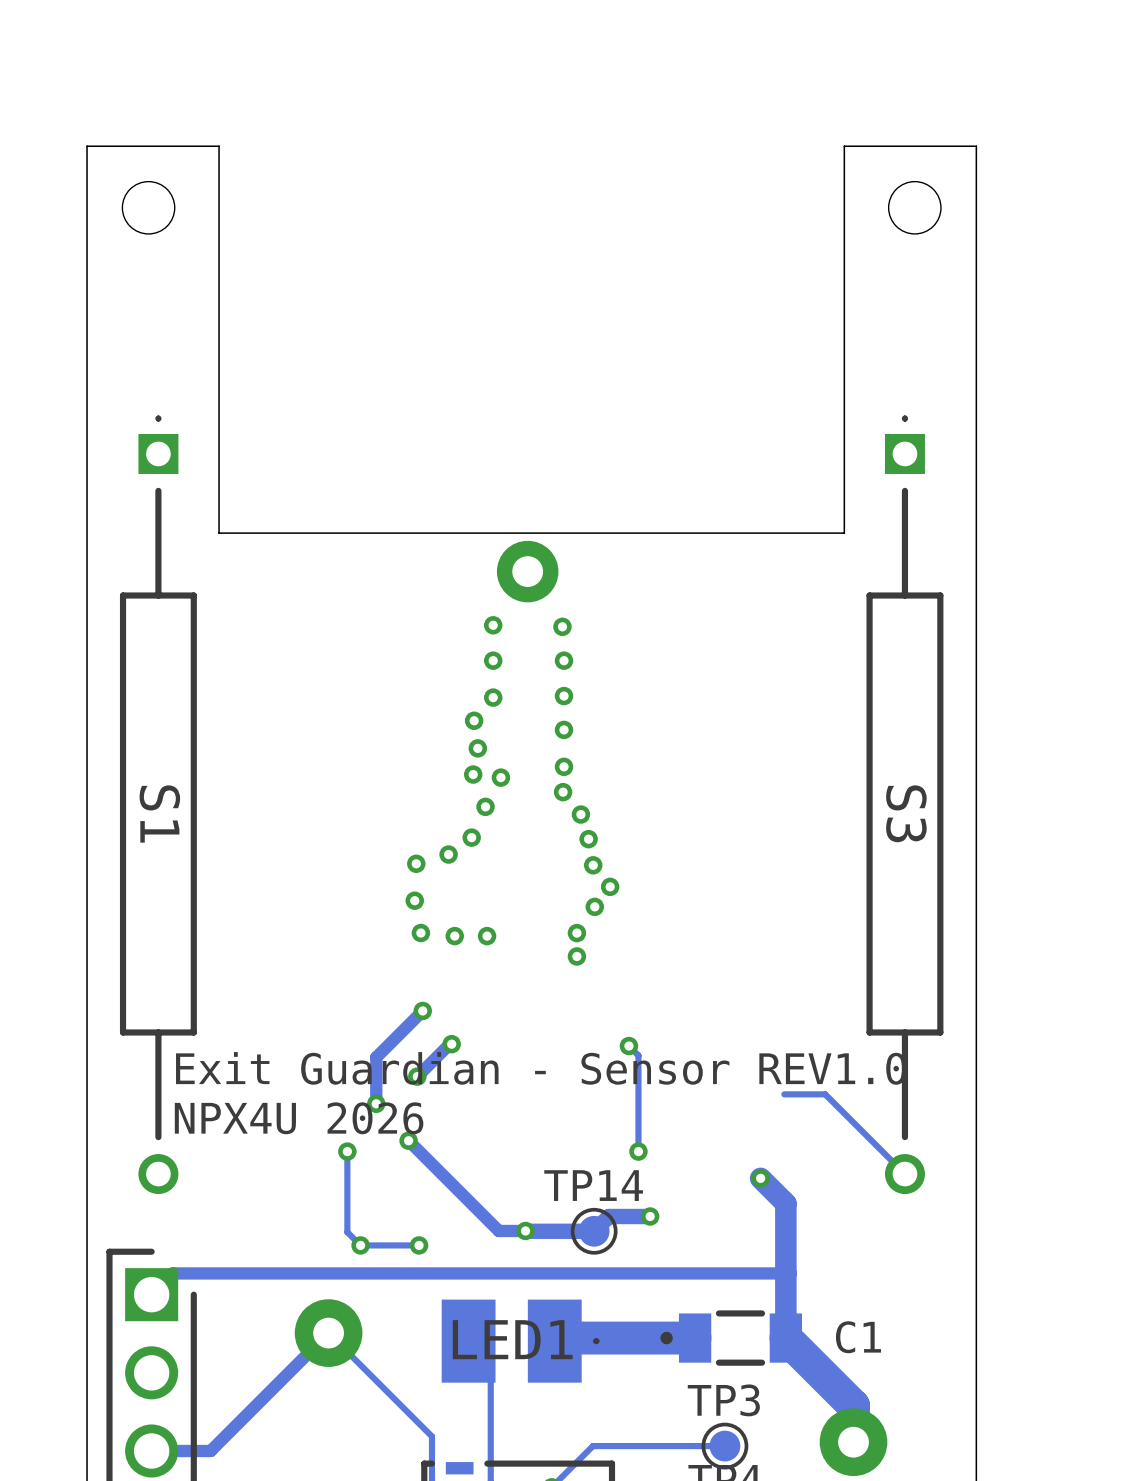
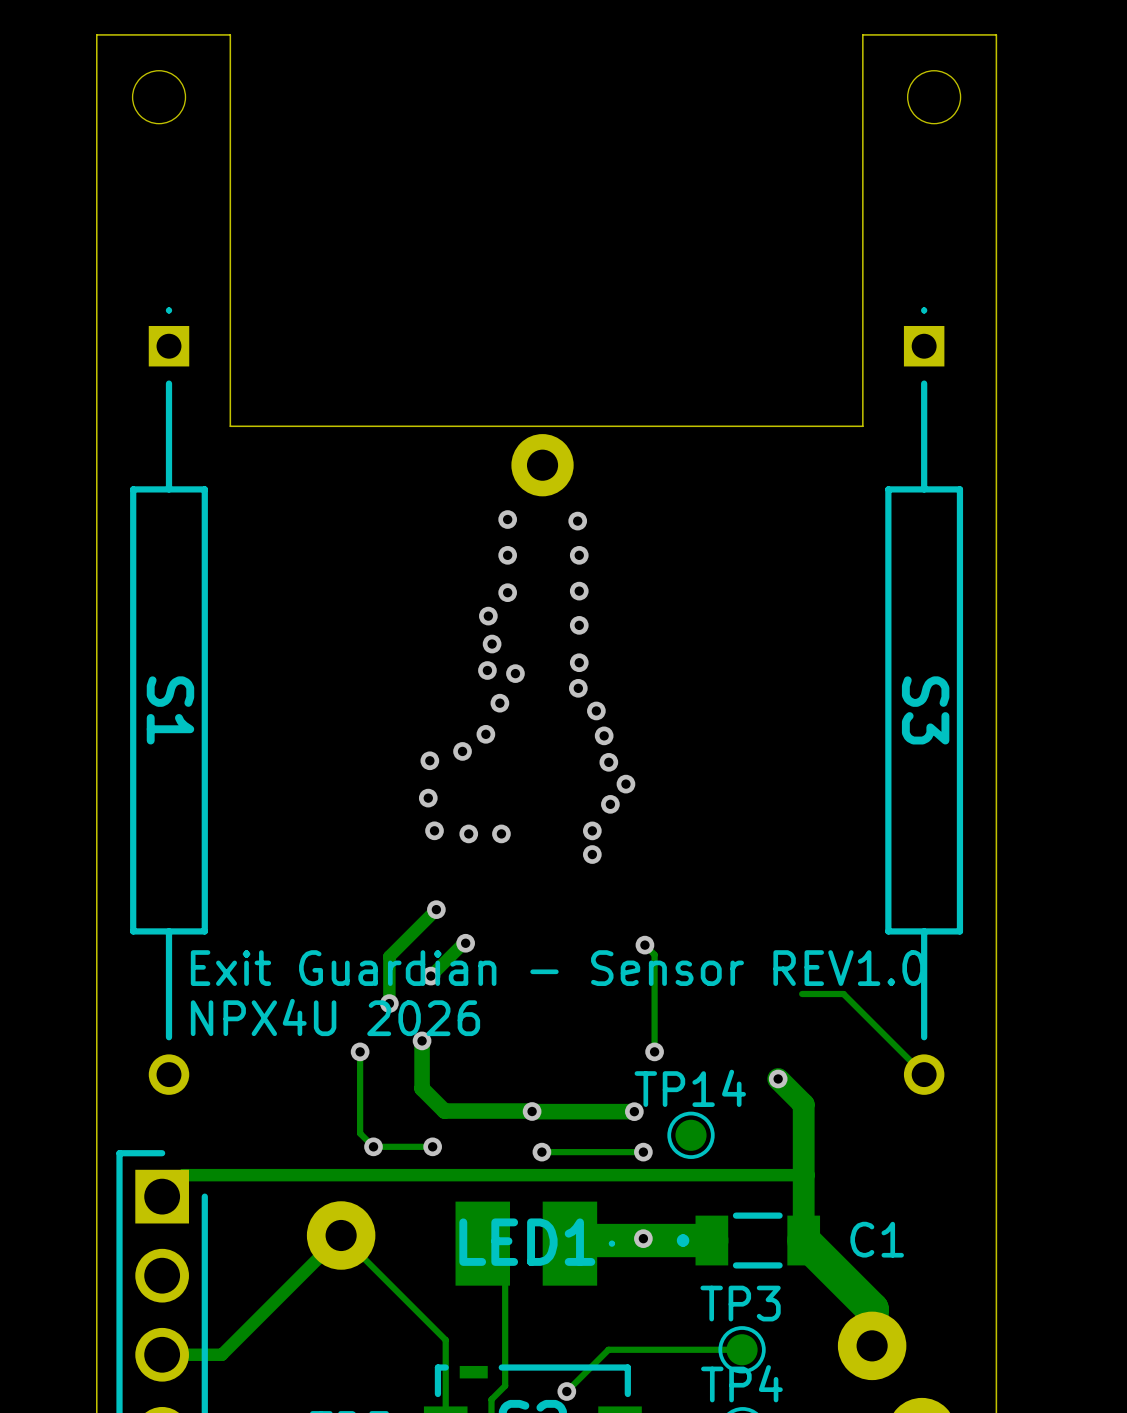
track: (408, 1140) (498, 1230) (525, 1230) -> (422, 1040) (422, 1088) (444, 1111) (634, 1111)
via: none -> (532, 1111)
via: none -> (634, 1111)
track: (650, 1216) (608, 1216) (594, 1231) (525, 1231) -> none
via: (650, 1216) -> none
via: (525, 1230) -> none
TP14 position: (594, 1231) -> (691, 1135)
via: none -> (541, 1152)
track: none -> (643, 1152) (541, 1152)
via: none -> (643, 1152)
via: none -> (643, 1238)

